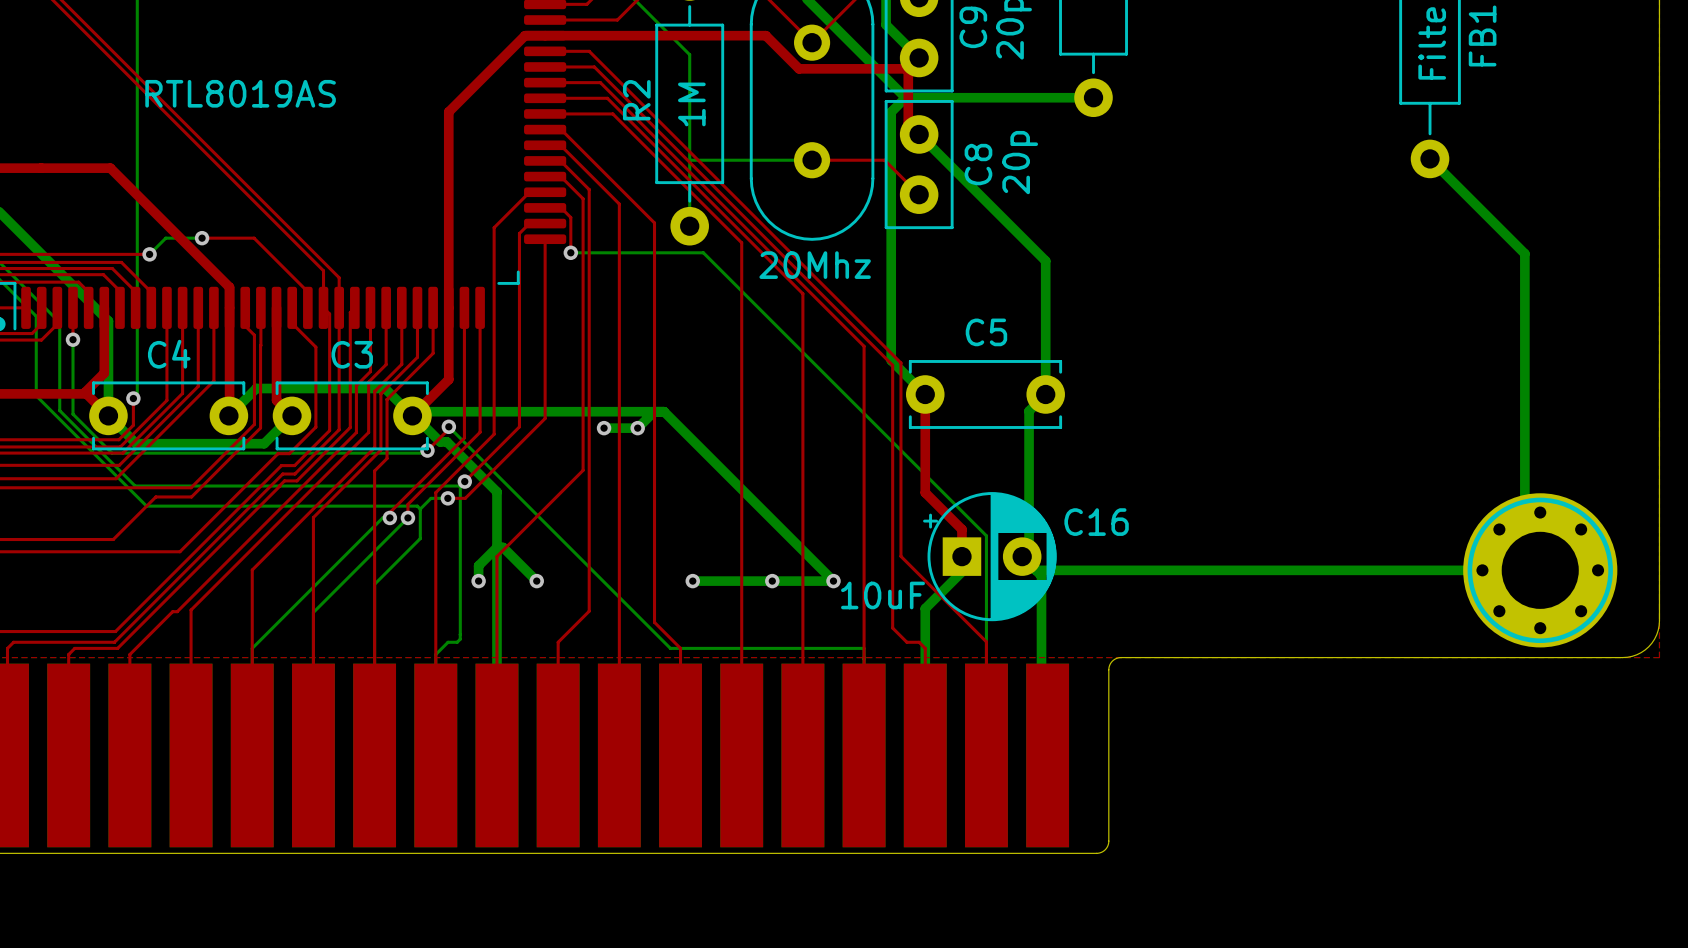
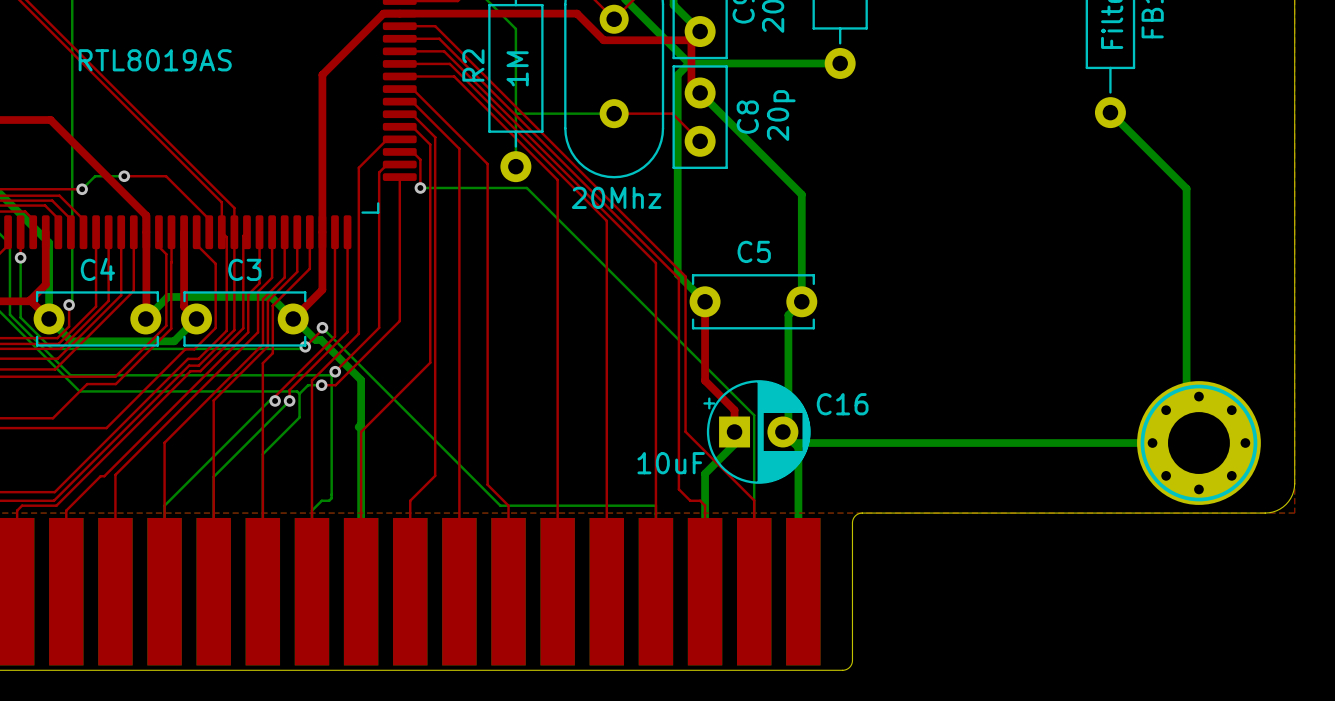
bottom track: (416, 411) (664, 411) (833, 581) (692, 581) -> none
bottom track: (654, 411) (637, 428) (604, 428) -> none
via: (604, 428) -> none
via: (637, 428) -> none
bottom track: (496, 547) (503, 547) (536, 581) -> none
bottom track: (493, 550) (478, 565) (478, 581) -> none
via: (478, 581) -> none
via: (536, 581) -> none
via: (692, 581) -> none
via: (772, 581) -> none
via: (833, 581) -> none

